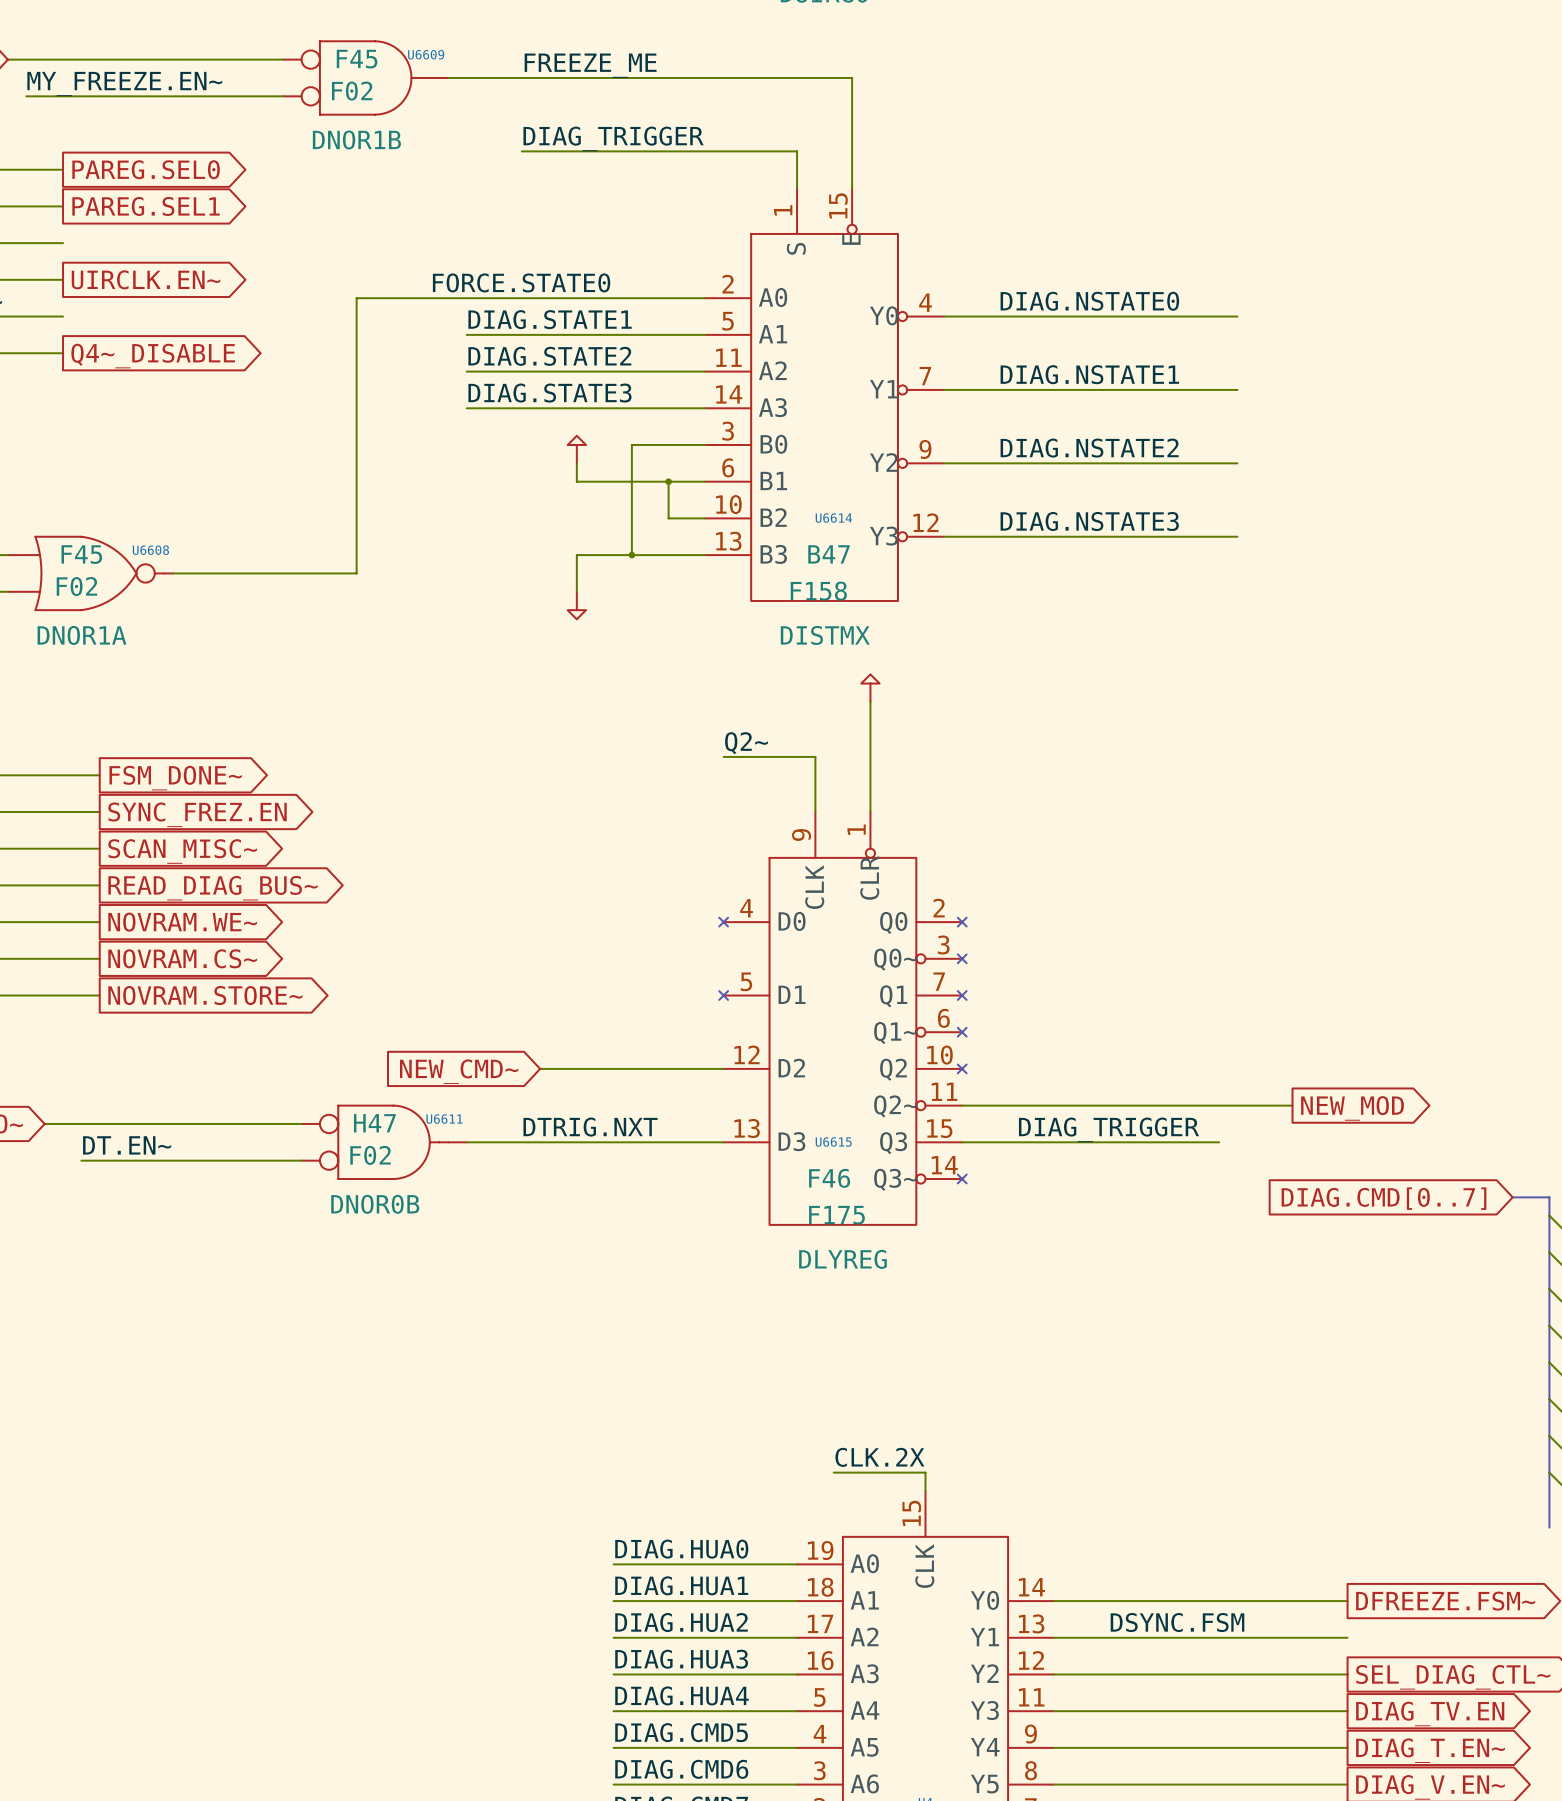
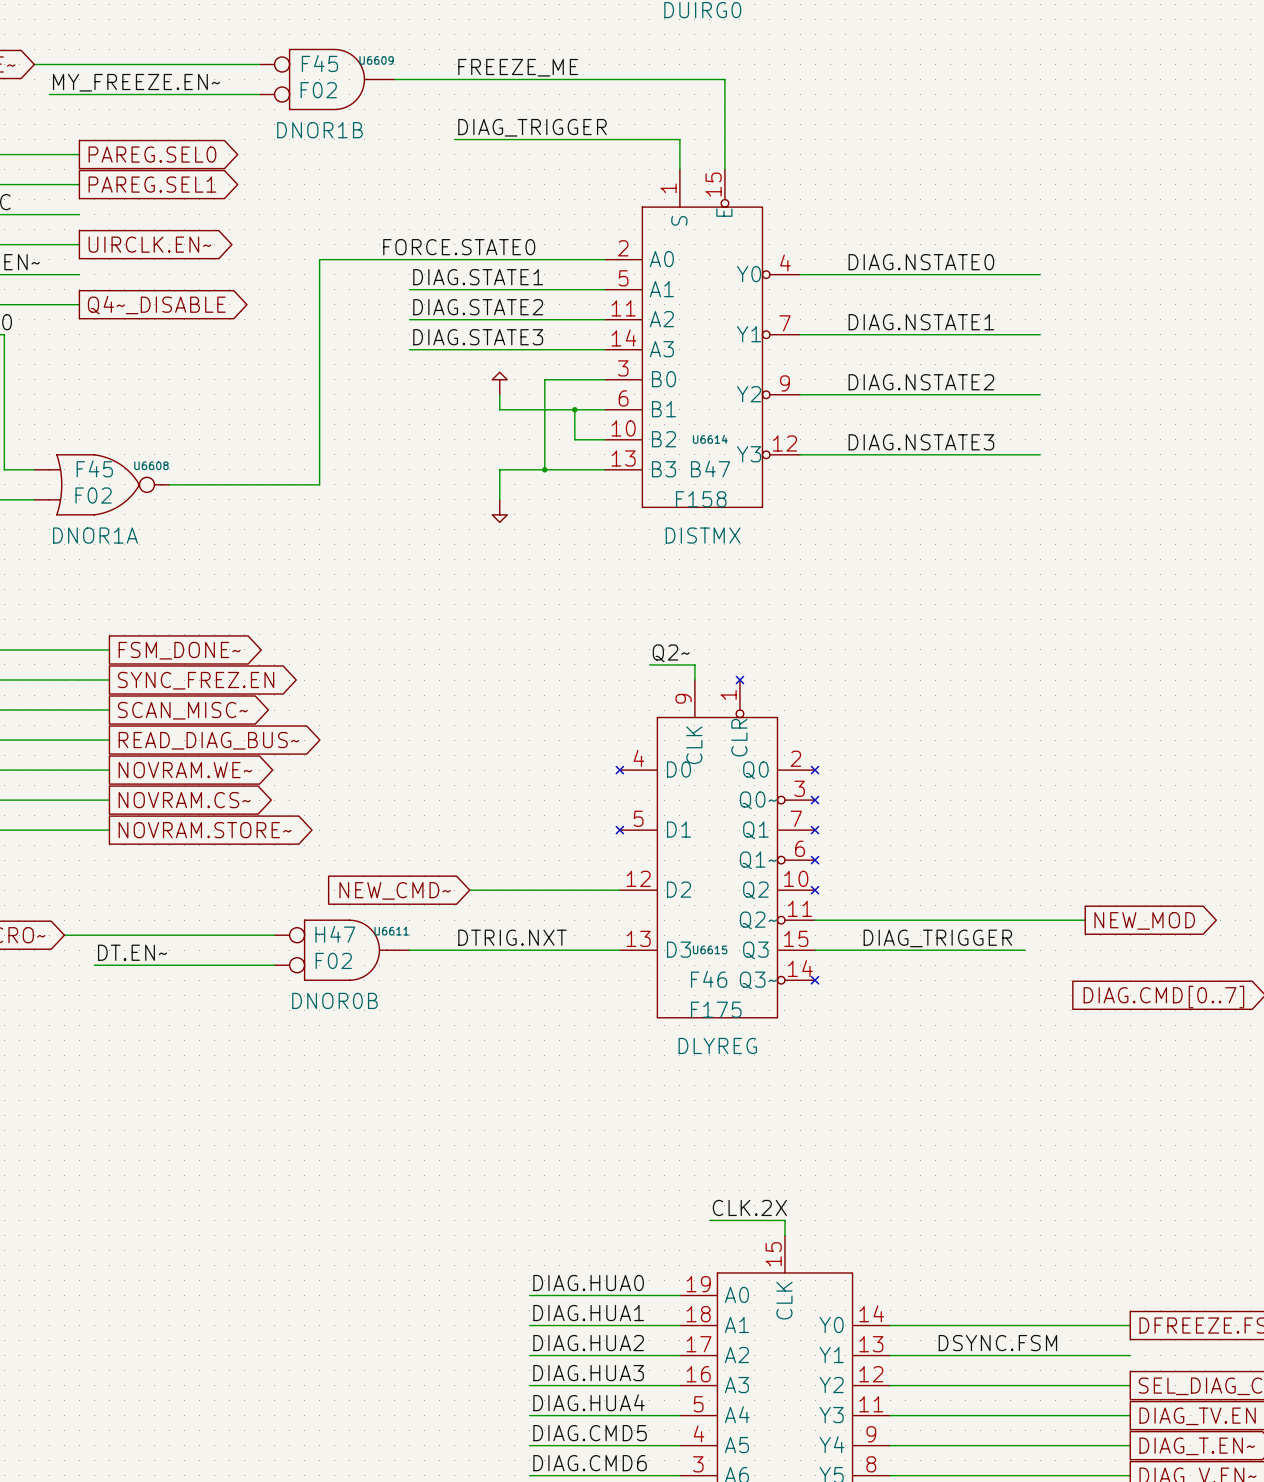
power symbol: (870, 687) -> none
wire: (870, 701) (870, 812) -> none
label position: Q2~ (746, 743) -> Q2~ (671, 653)
wire: (723, 756) (815, 756) (815, 793) -> (649, 664) (694, 664)
no-connect mark: none -> (739, 680)

